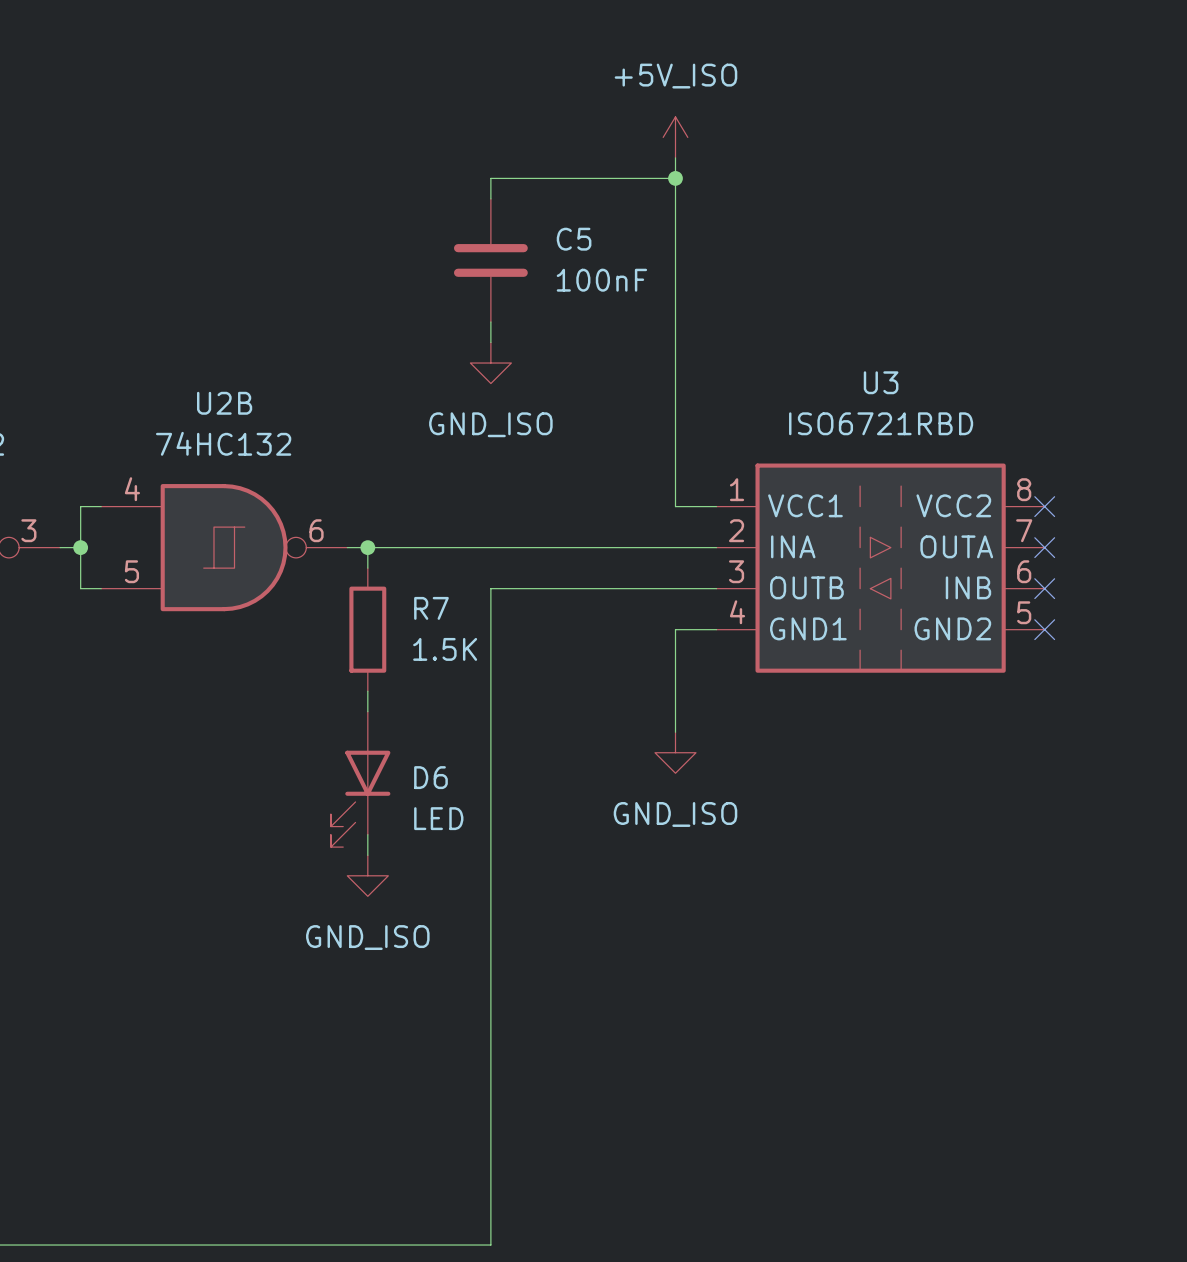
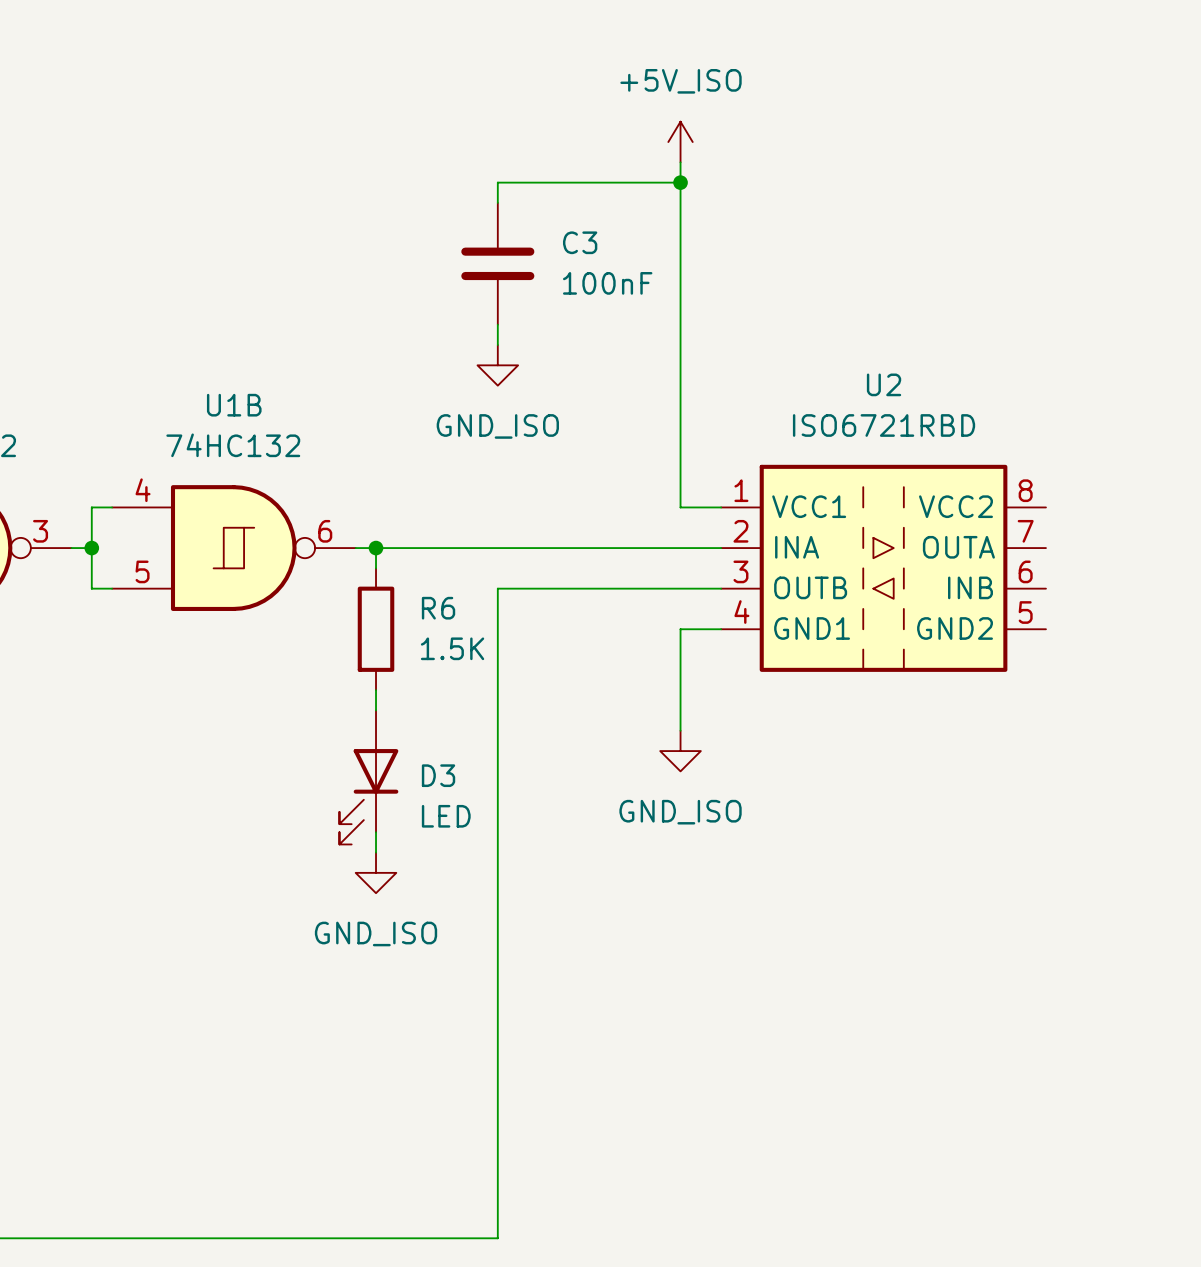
C5 name: C5 (574, 239) -> C3 (580, 242)
U3 name: U3 (881, 382) -> U2 (884, 384)
U2B name: U2B (224, 403) -> U1B (234, 405)
no-connect mark: (1044, 506) -> none
no-connect mark: (1044, 547) -> none
no-connect mark: (1044, 588) -> none
R7 name: R7 (431, 608) -> R6 (438, 608)
no-connect mark: (1044, 629) -> none
D6 name: D6 (430, 777) -> D3 (438, 775)

